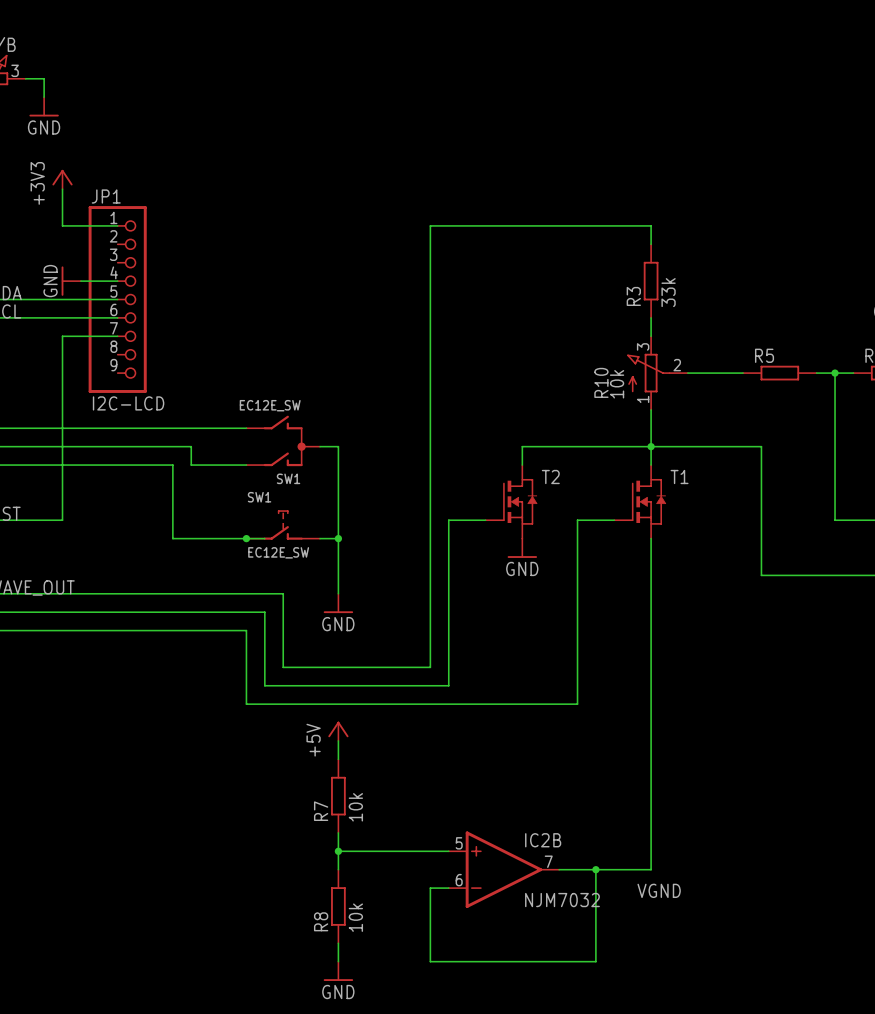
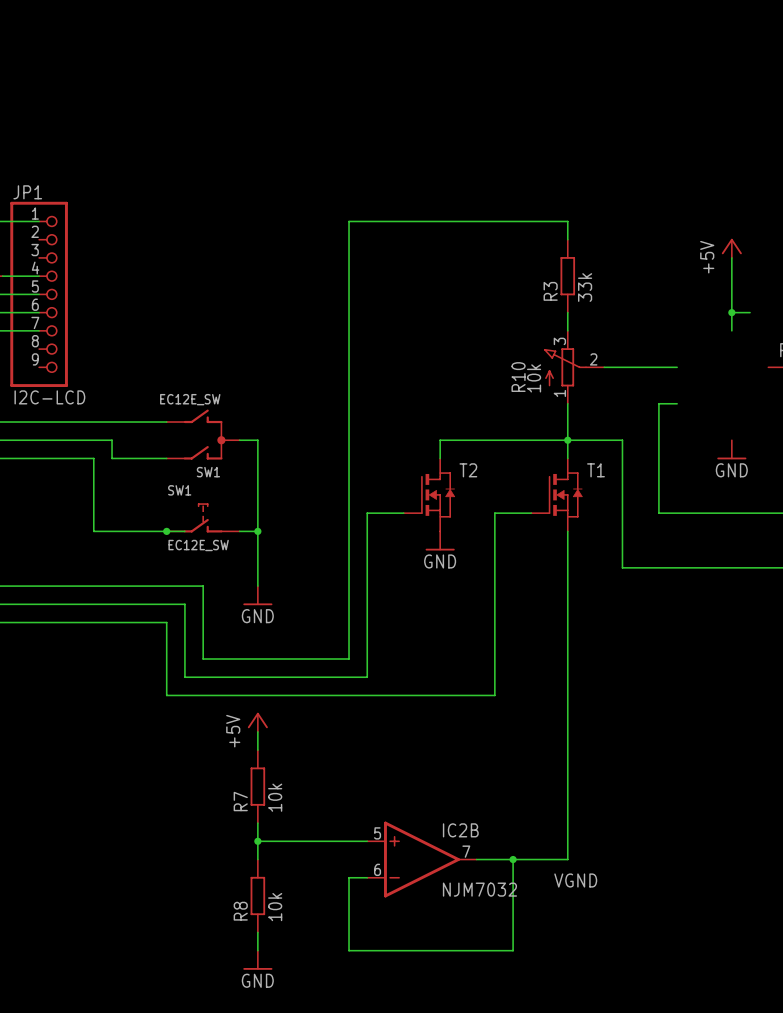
power symbol: none -> +5V (731, 248)
wire: none -> (731, 257) (731, 330)
wire: none -> (731, 312) (750, 312)
junction: none -> (731, 312)
R5: (779, 373) -> none
wire: (816, 373) (853, 373) -> none
wire: (835, 373) (835, 520) -> (677, 403) (658, 403) (658, 513) (750, 513)
junction: (835, 373) -> none
wire: (706, 446) (761, 446) (761, 575) -> (622, 440) (622, 567) (677, 567)
power symbol: none -> GND (731, 449)

